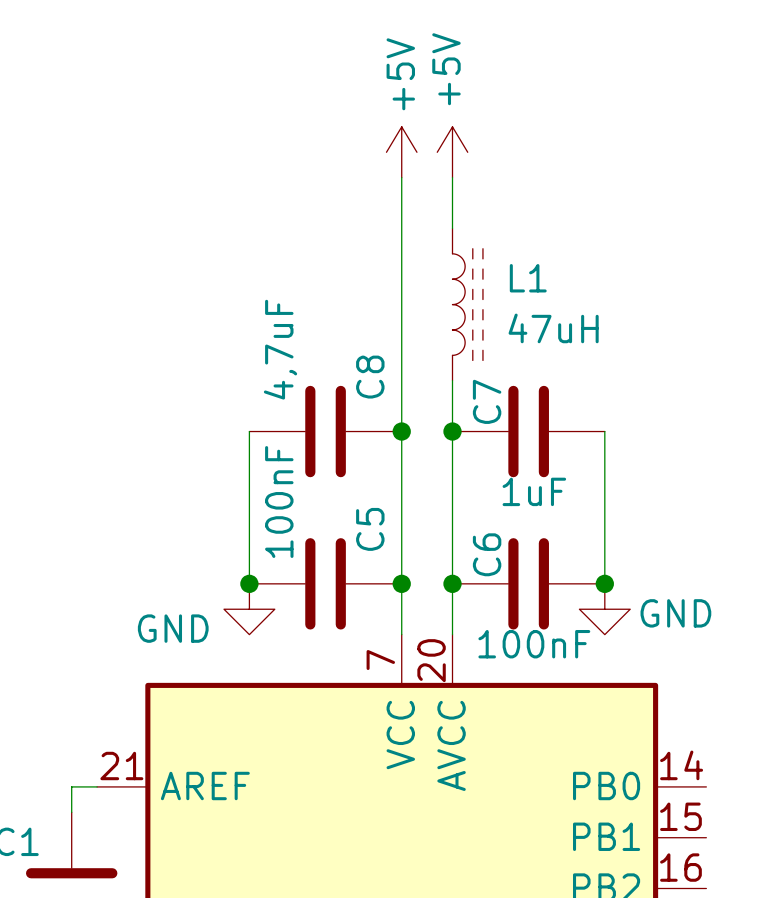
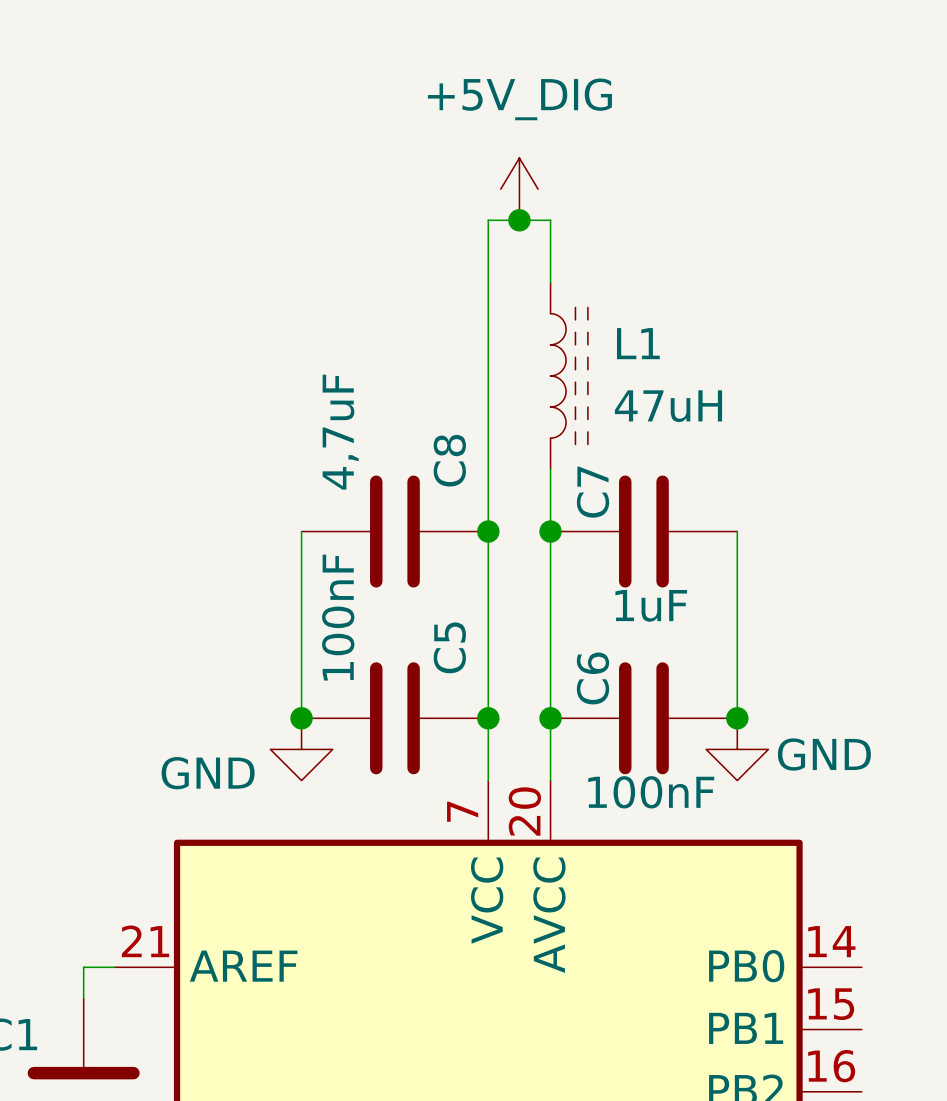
power symbol: +5V (401, 152) -> none
power symbol: none -> +5V_DIG (519, 189)
power symbol: +5V (452, 152) -> none
wire: none -> (488, 220) (550, 220)
junction: none -> (519, 220)

